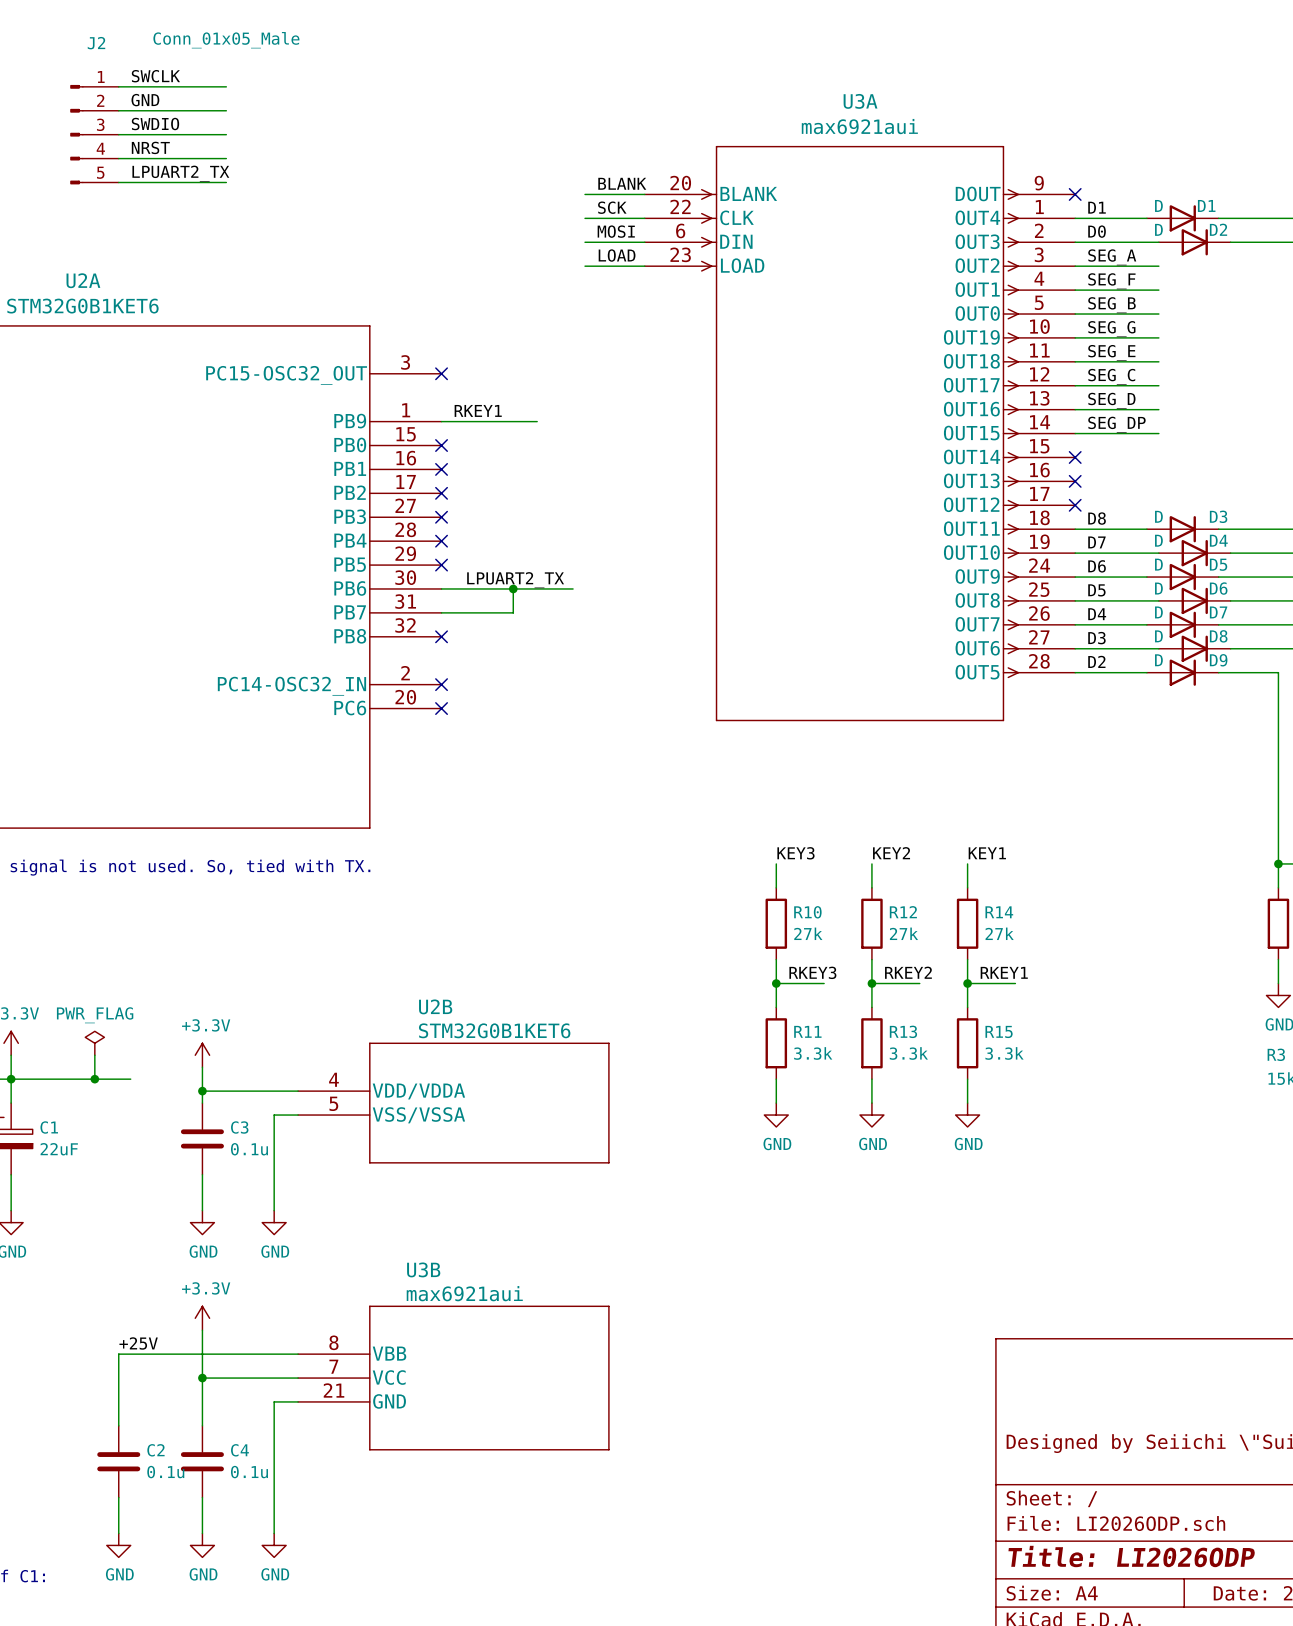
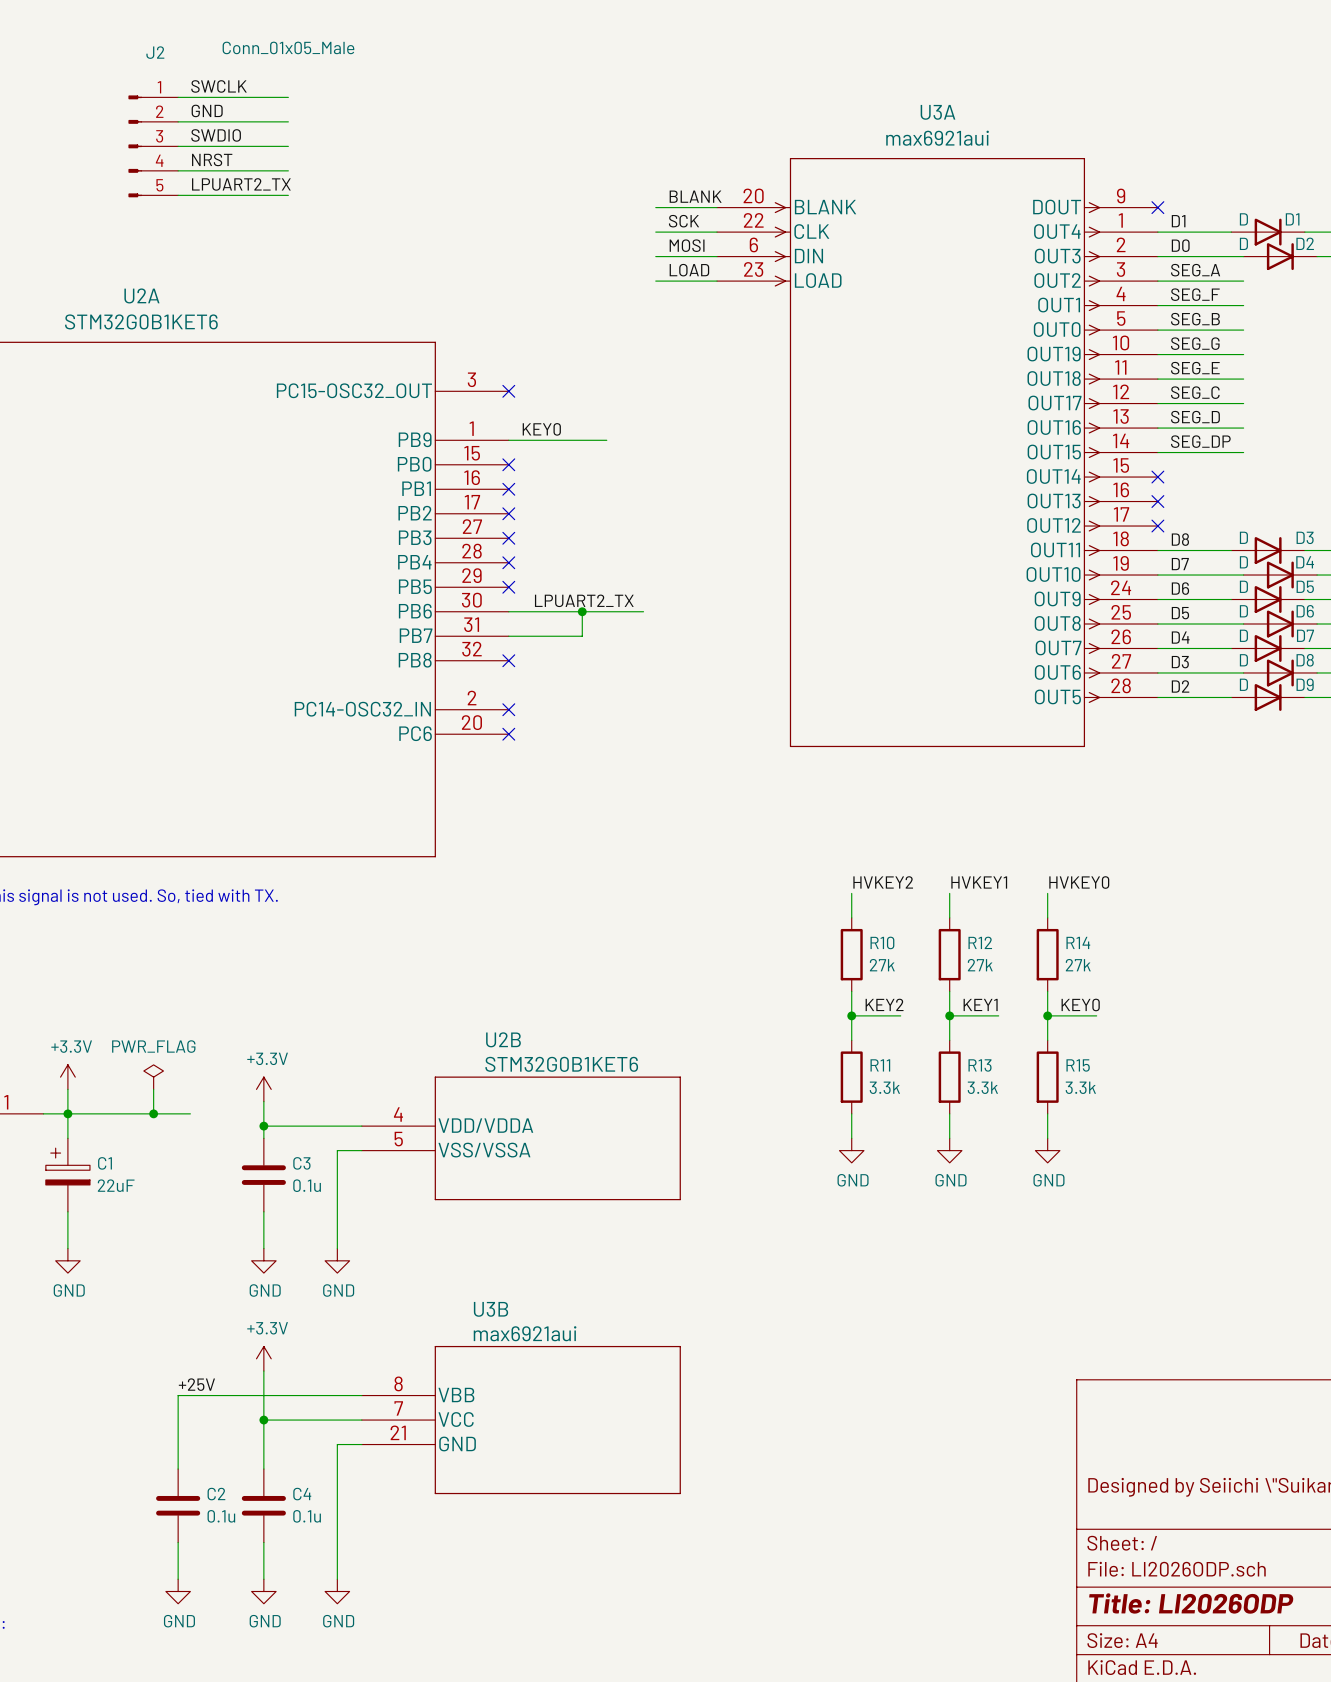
label: RKEY1 (478, 410) -> KEY0 (541, 429)
label: KEY3 (795, 853) -> HVKEY2 (883, 882)
label: KEY2 (891, 853) -> HVKEY1 (979, 882)
label: KEY1 (987, 853) -> HVKEY0 (1079, 882)
label: RKEY3 (812, 972) -> KEY2 (884, 1004)
label: RKEY2 (908, 972) -> KEY1 (980, 1004)
label: RKEY1 (1004, 972) -> KEY0 (1080, 1004)

